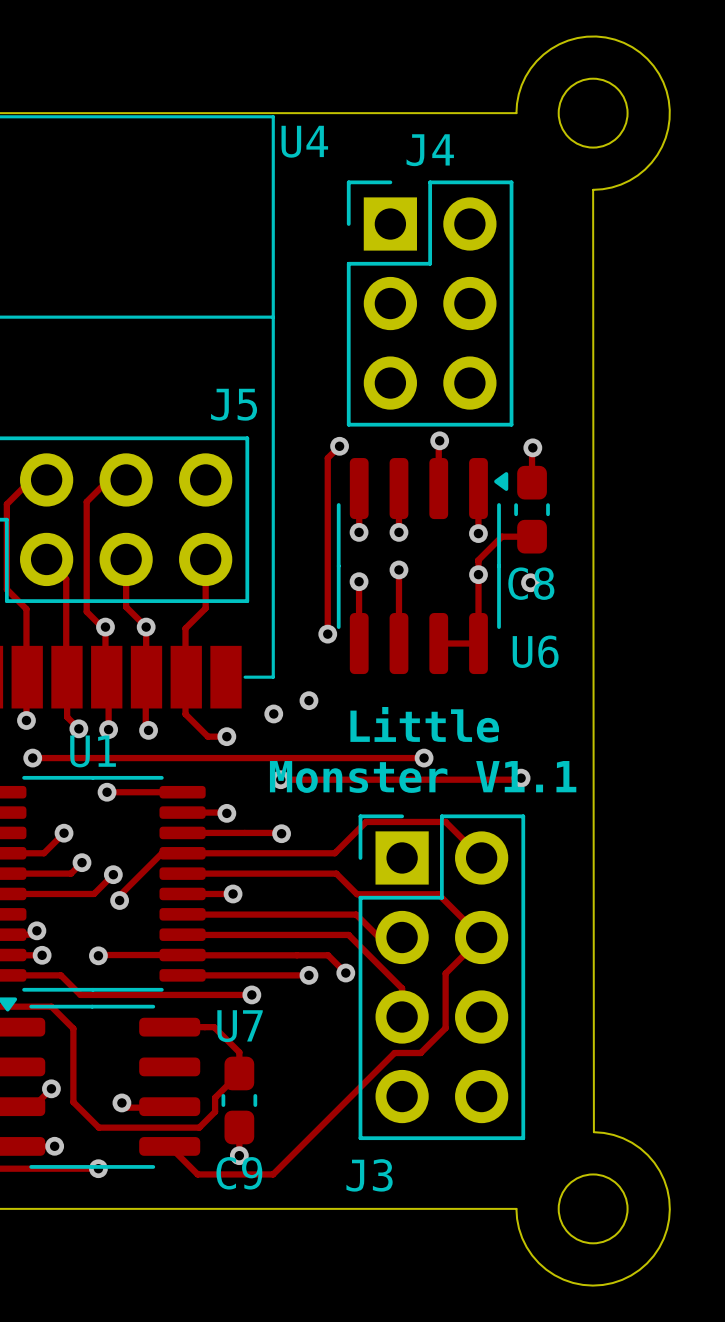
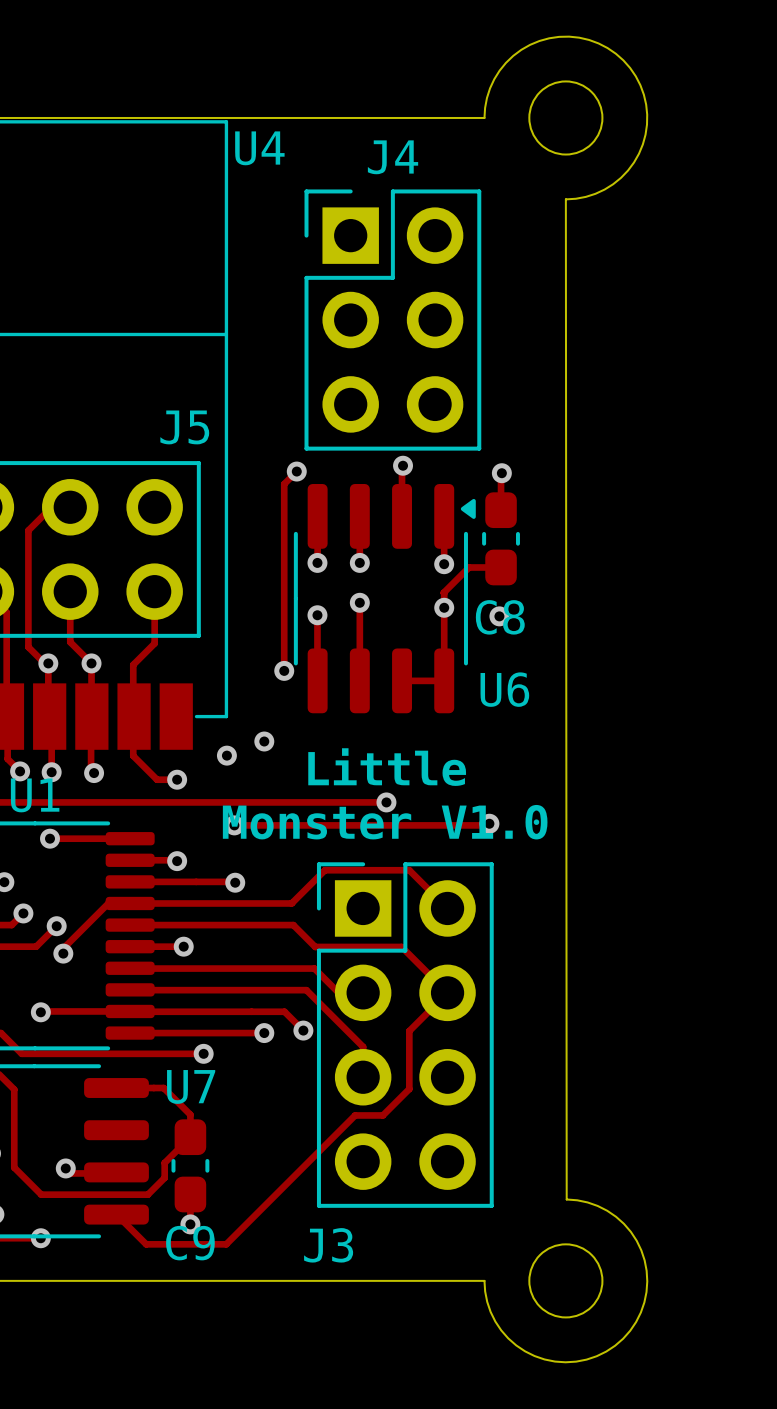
text: Monster V1.1 (423, 776) -> Monster V1.0 (385, 822)

